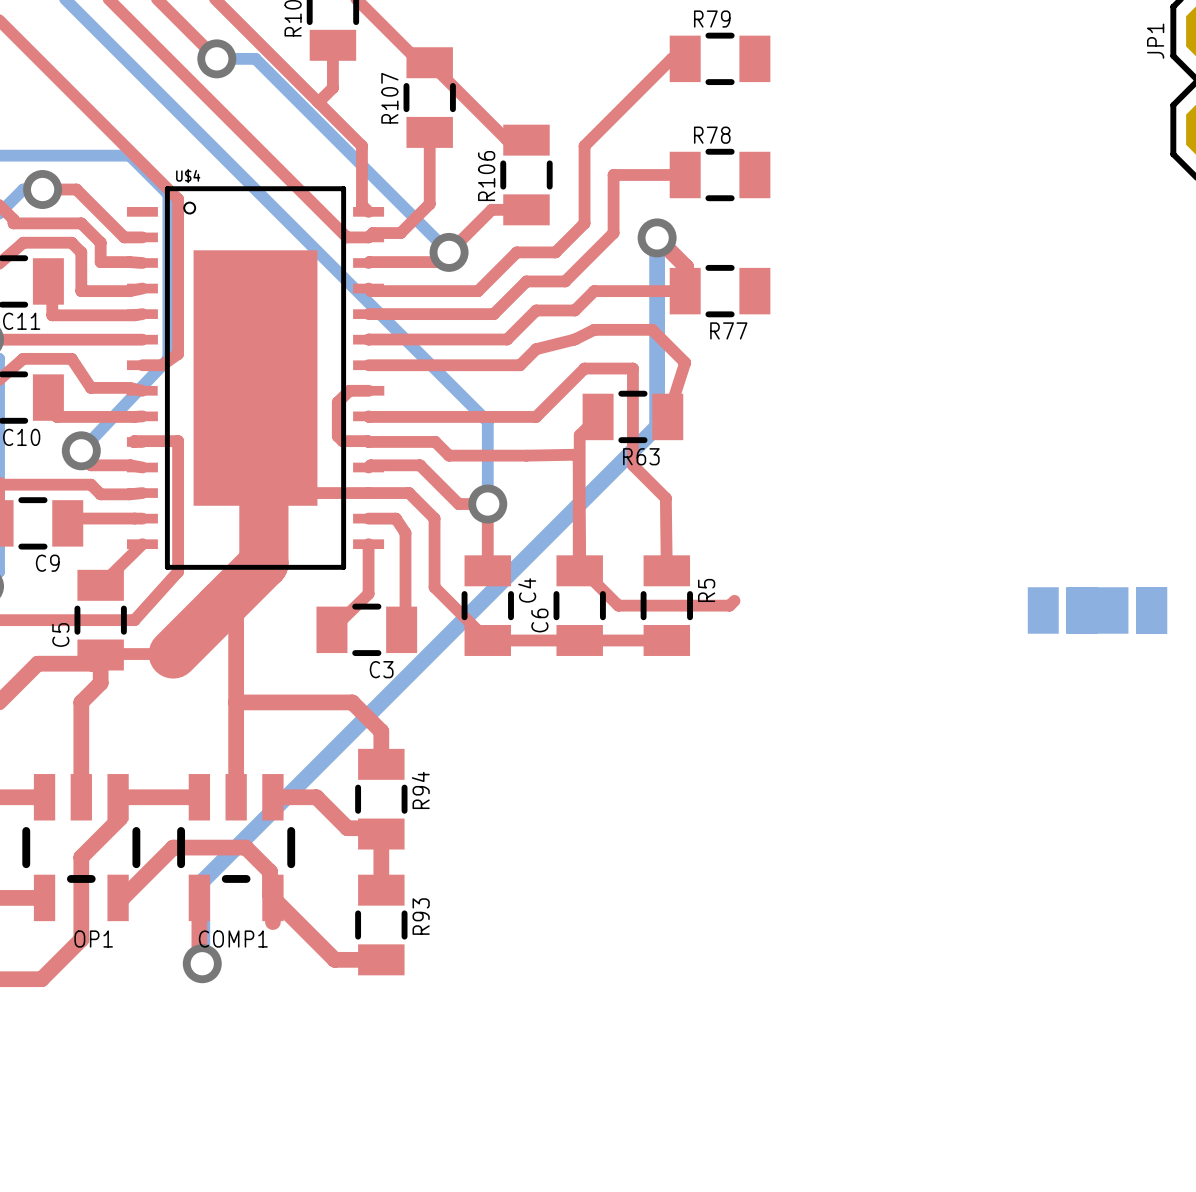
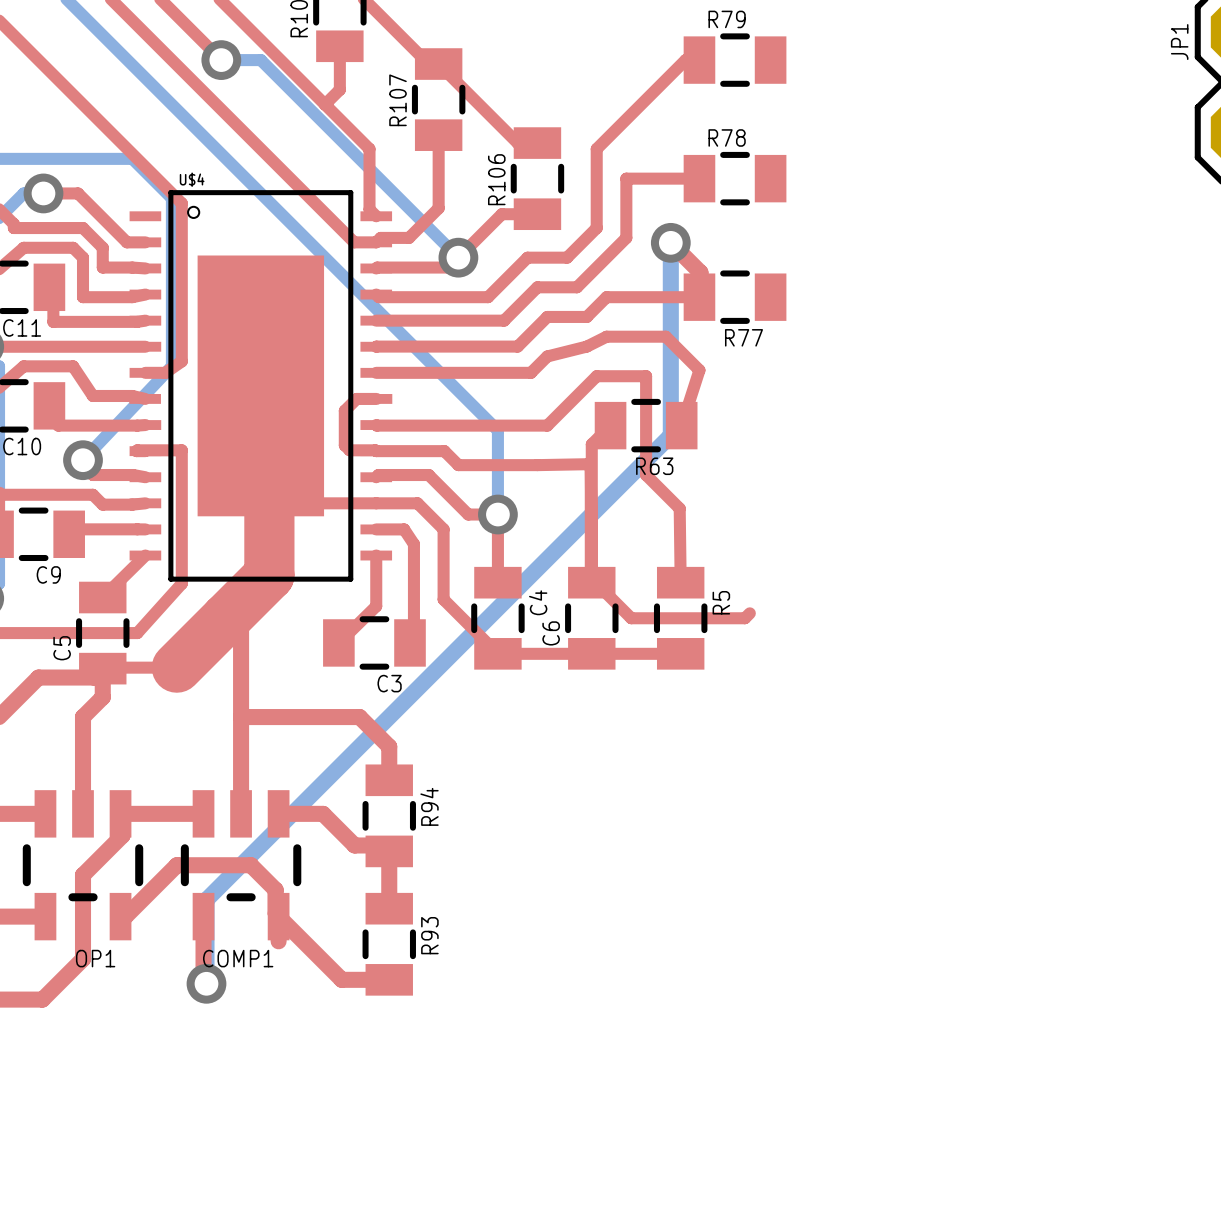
part: (1078, 610) -> none
part: (1116, 610) -> none

